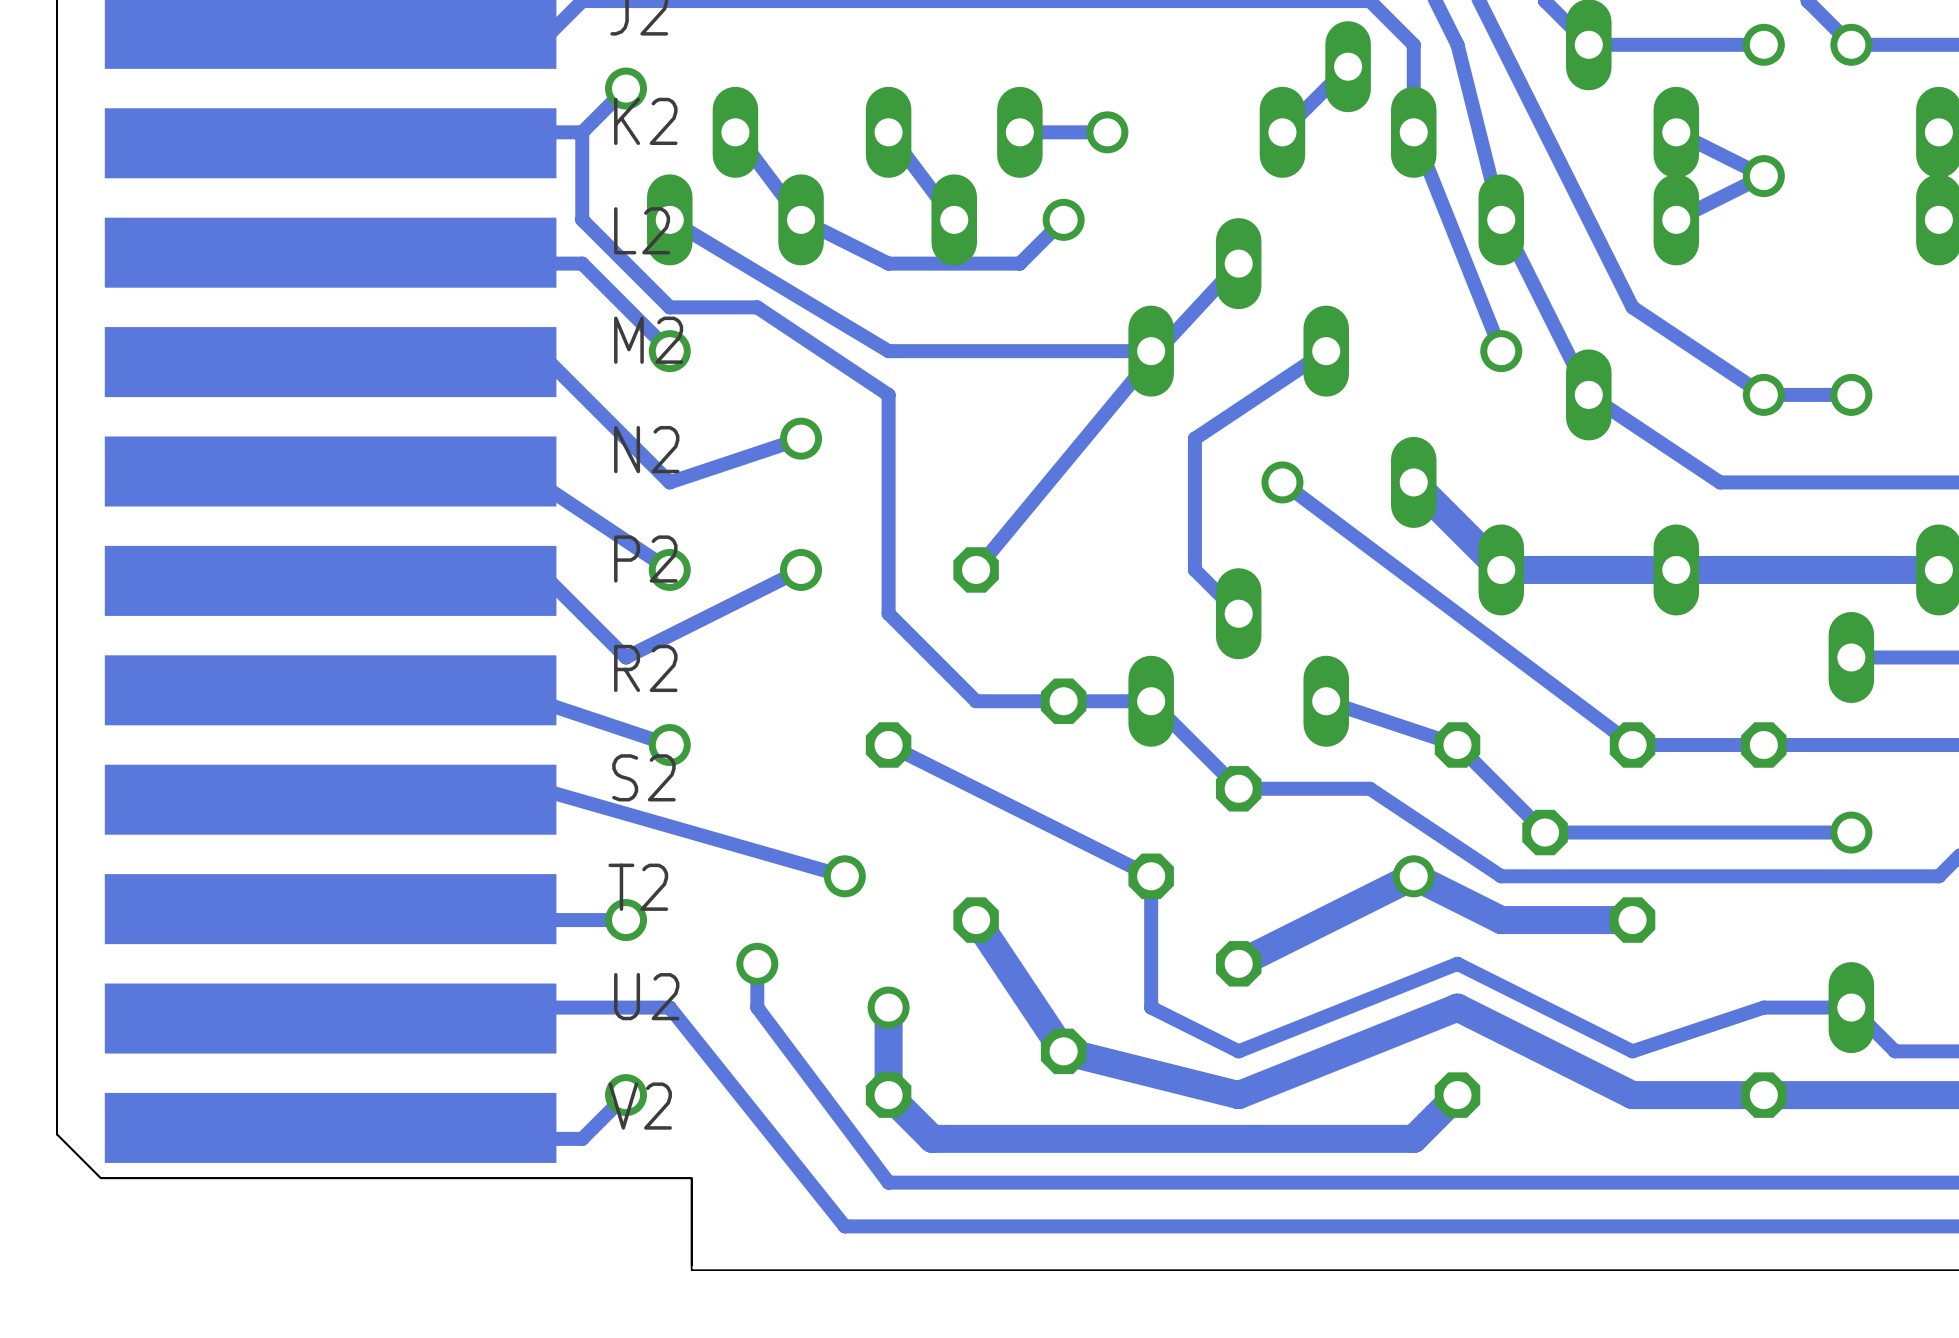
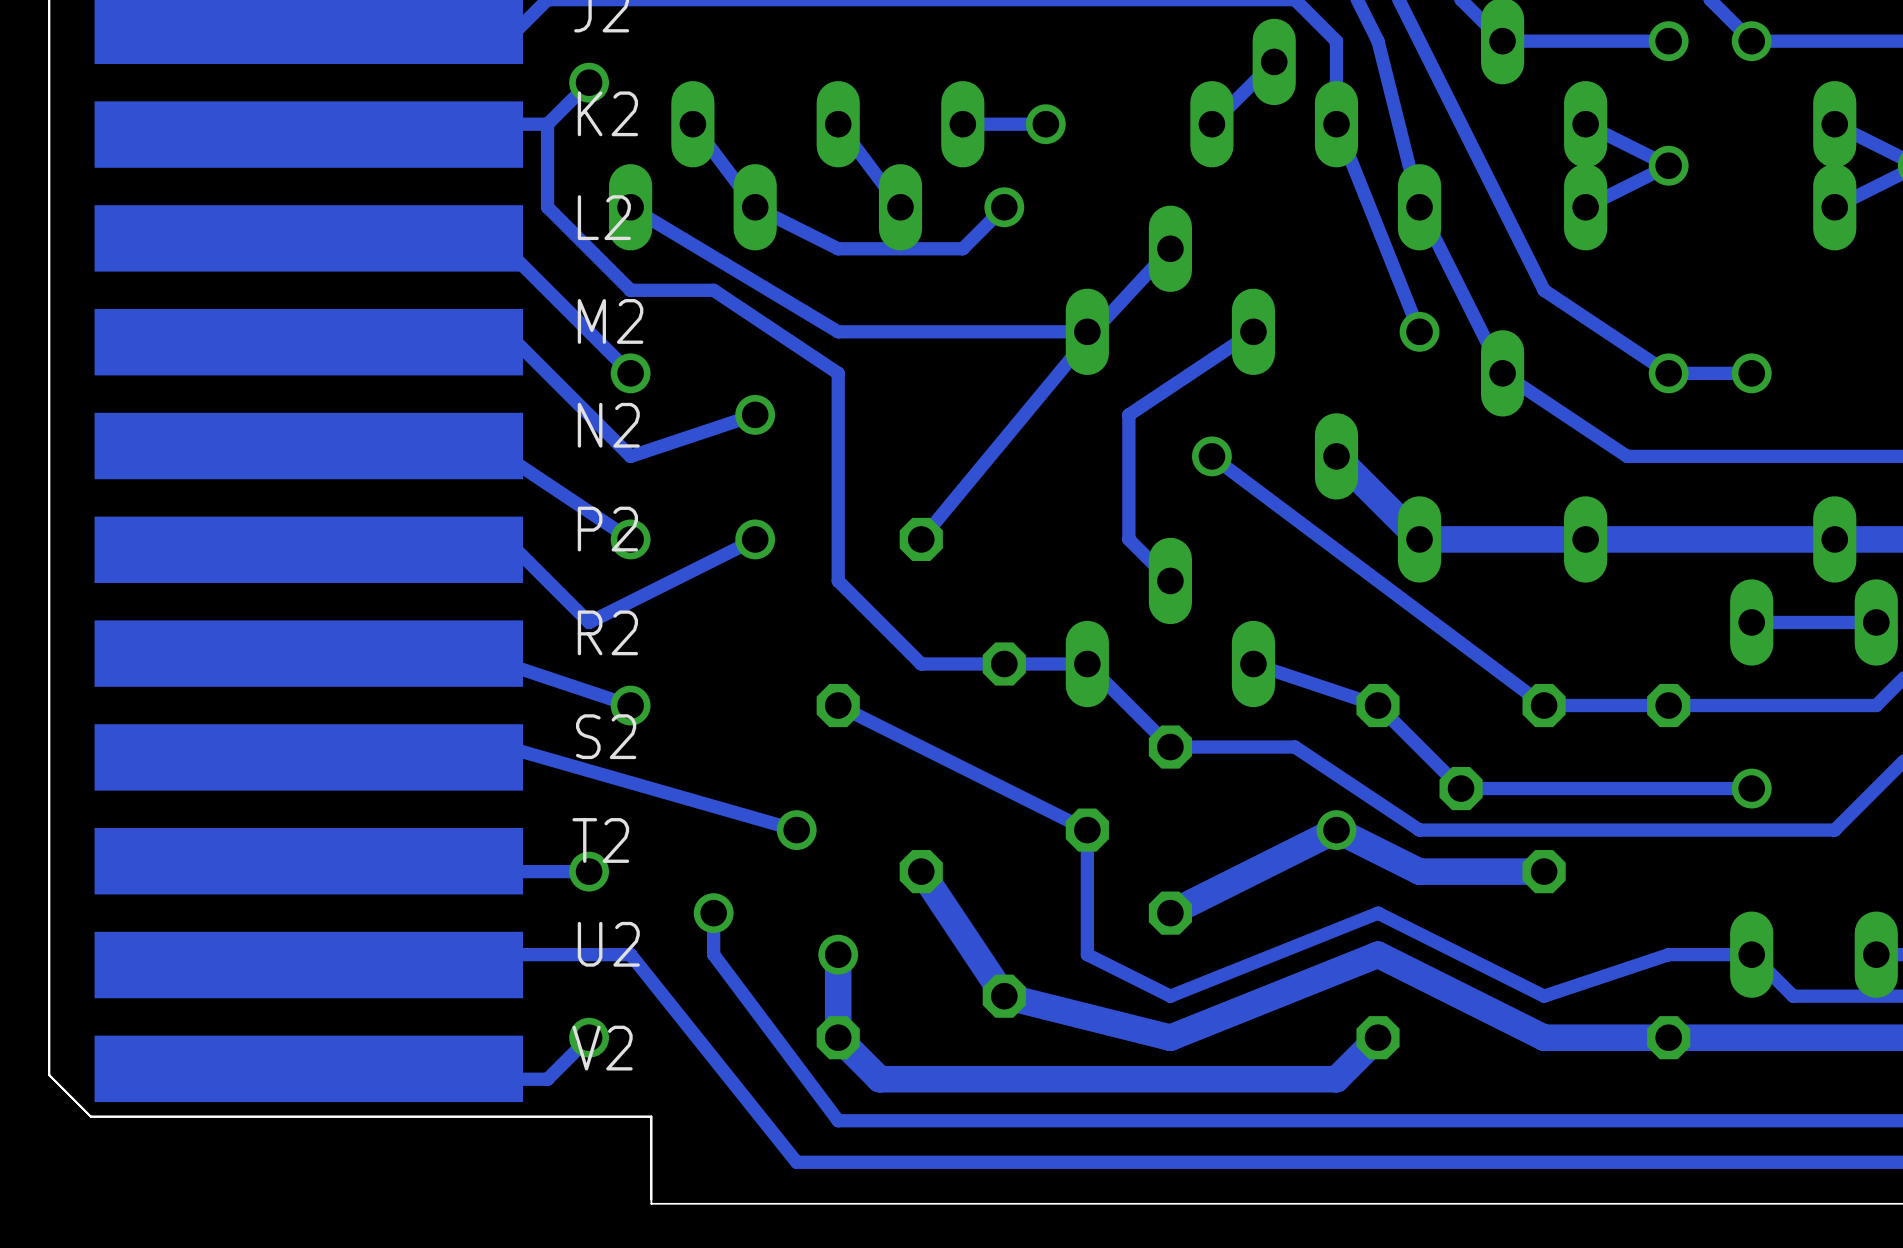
track: (538, 263) (582, 263) (669, 351) -> (506, 248) (630, 373)
via position: (669, 351) -> (630, 373)

